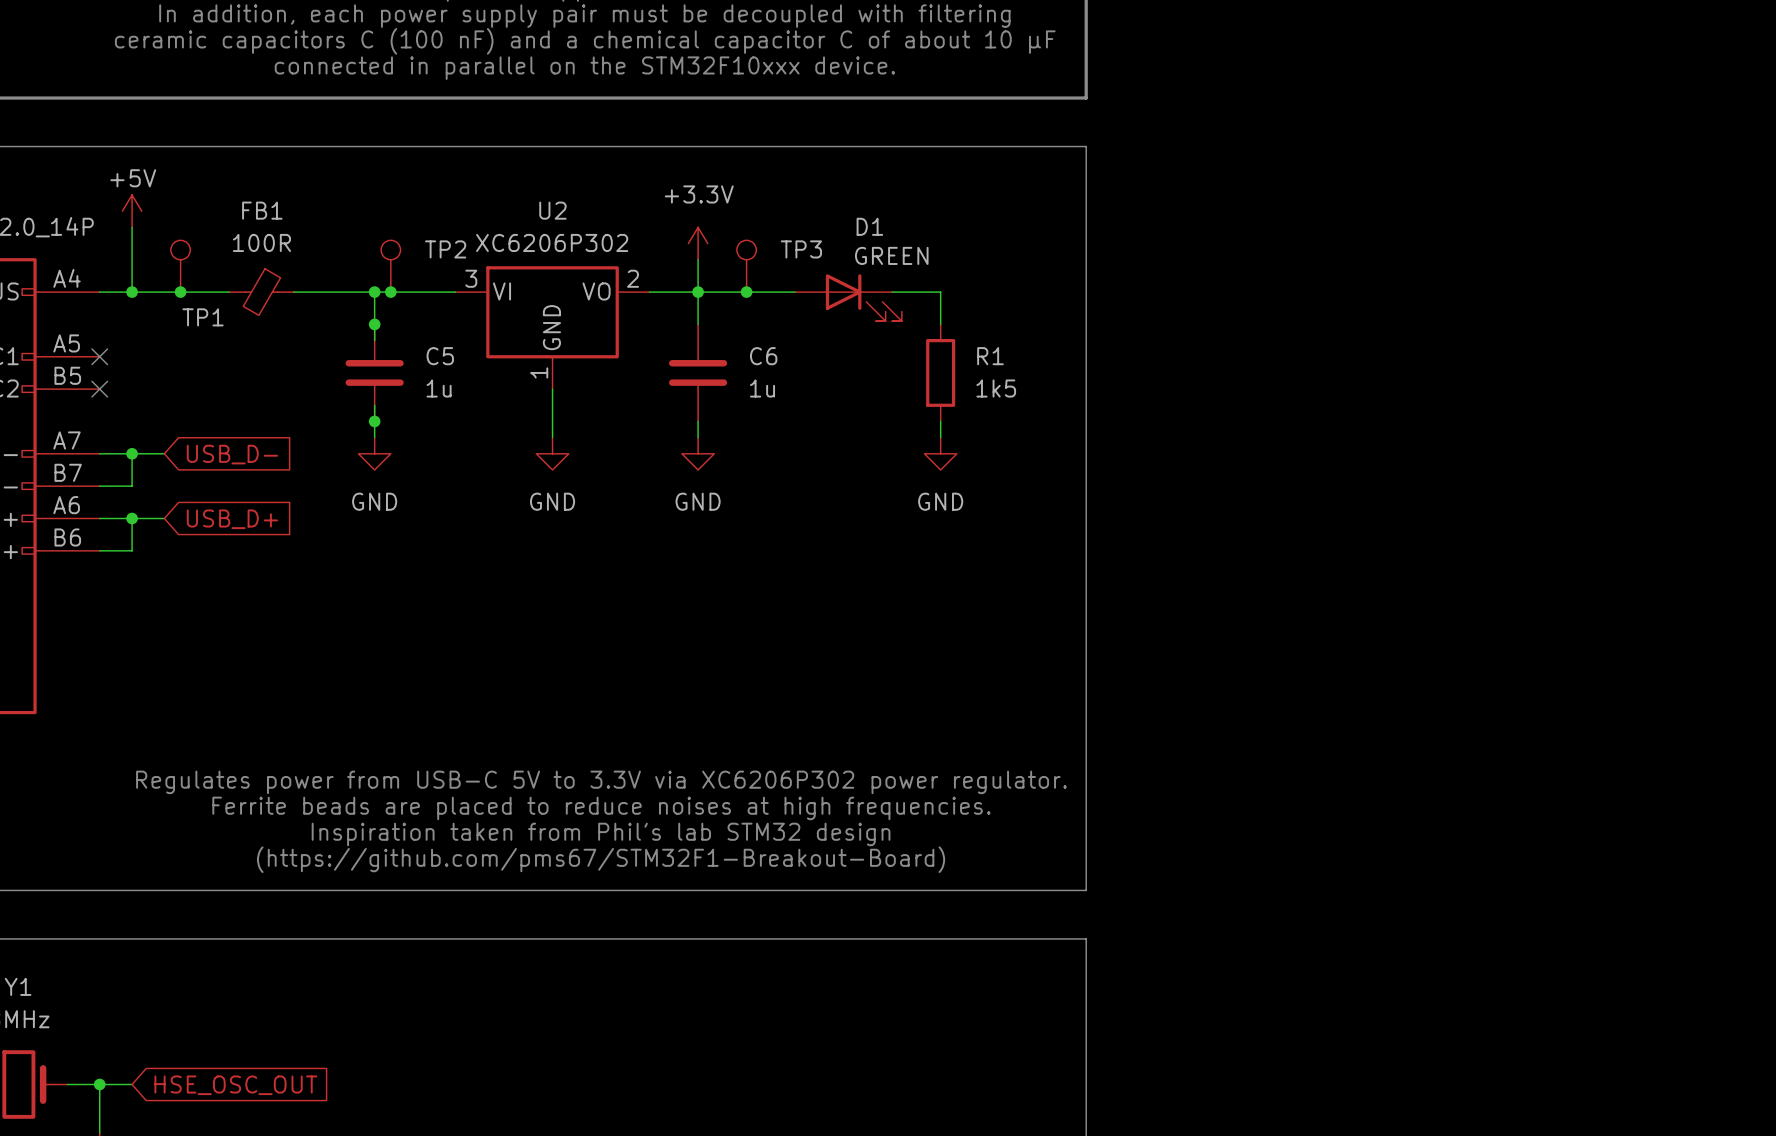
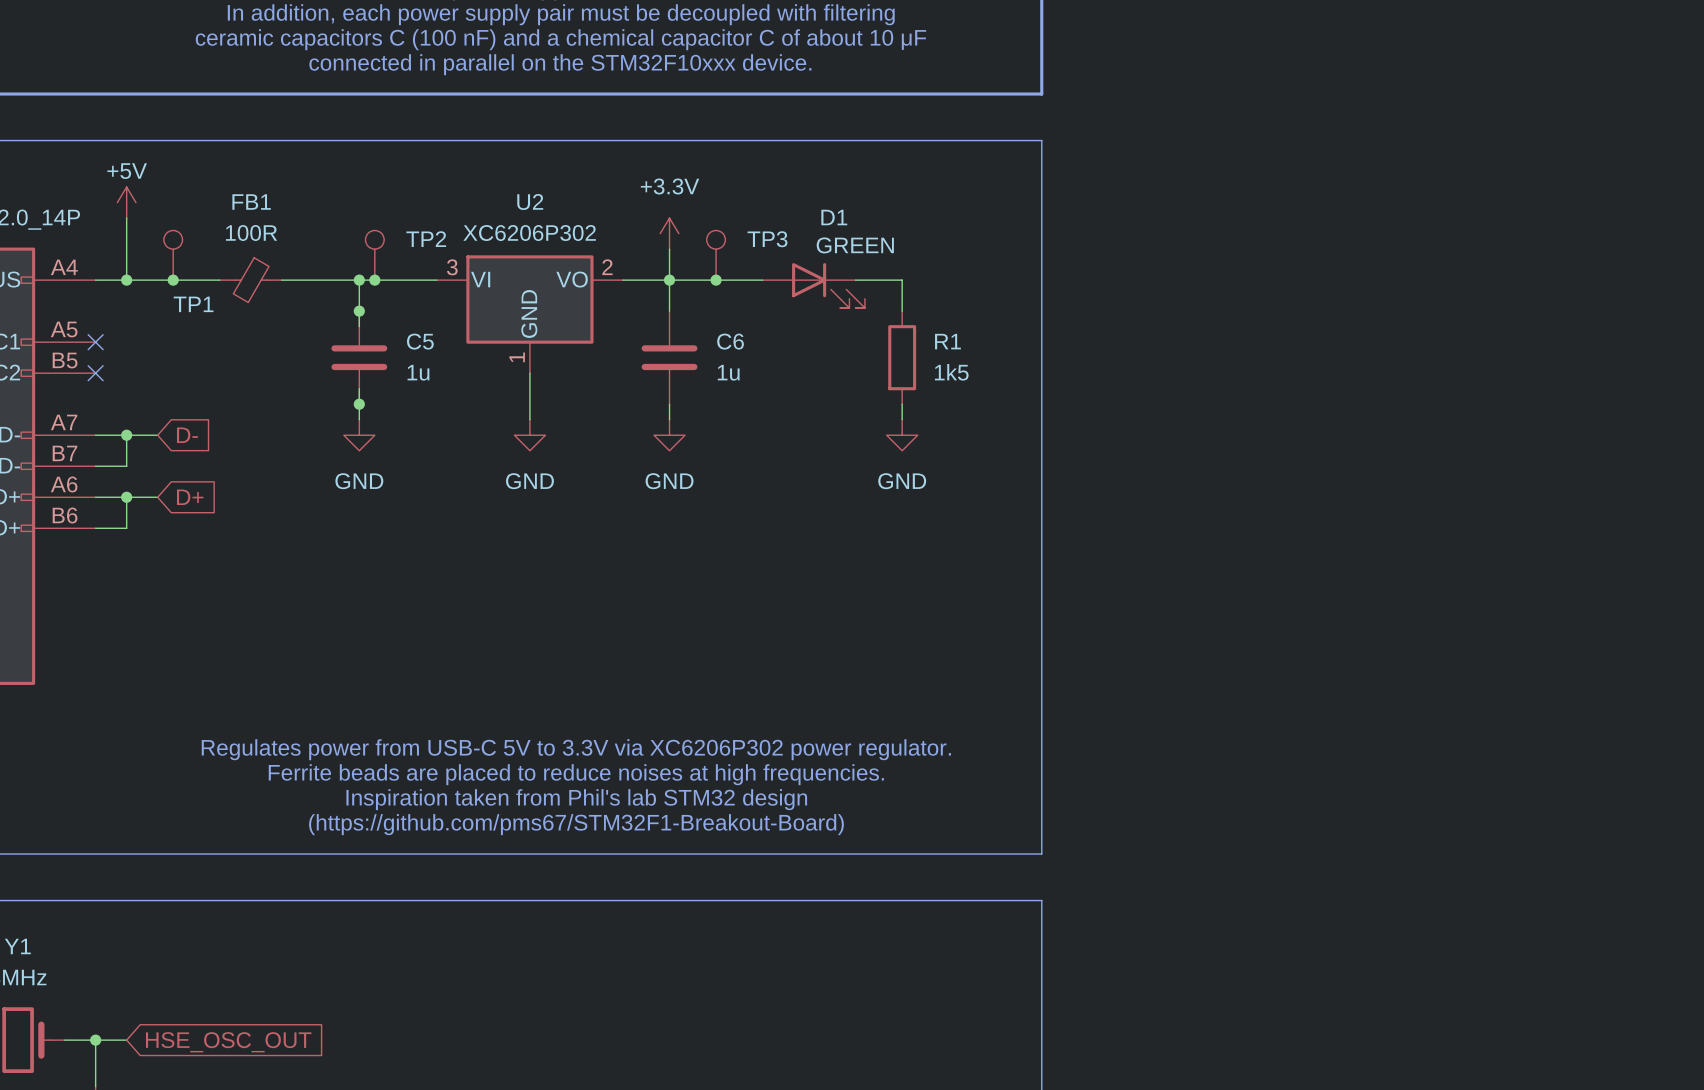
global label: USB_D- (232, 454) -> D- (187, 435)
global label: USB_D+ (232, 519) -> D+ (190, 497)

